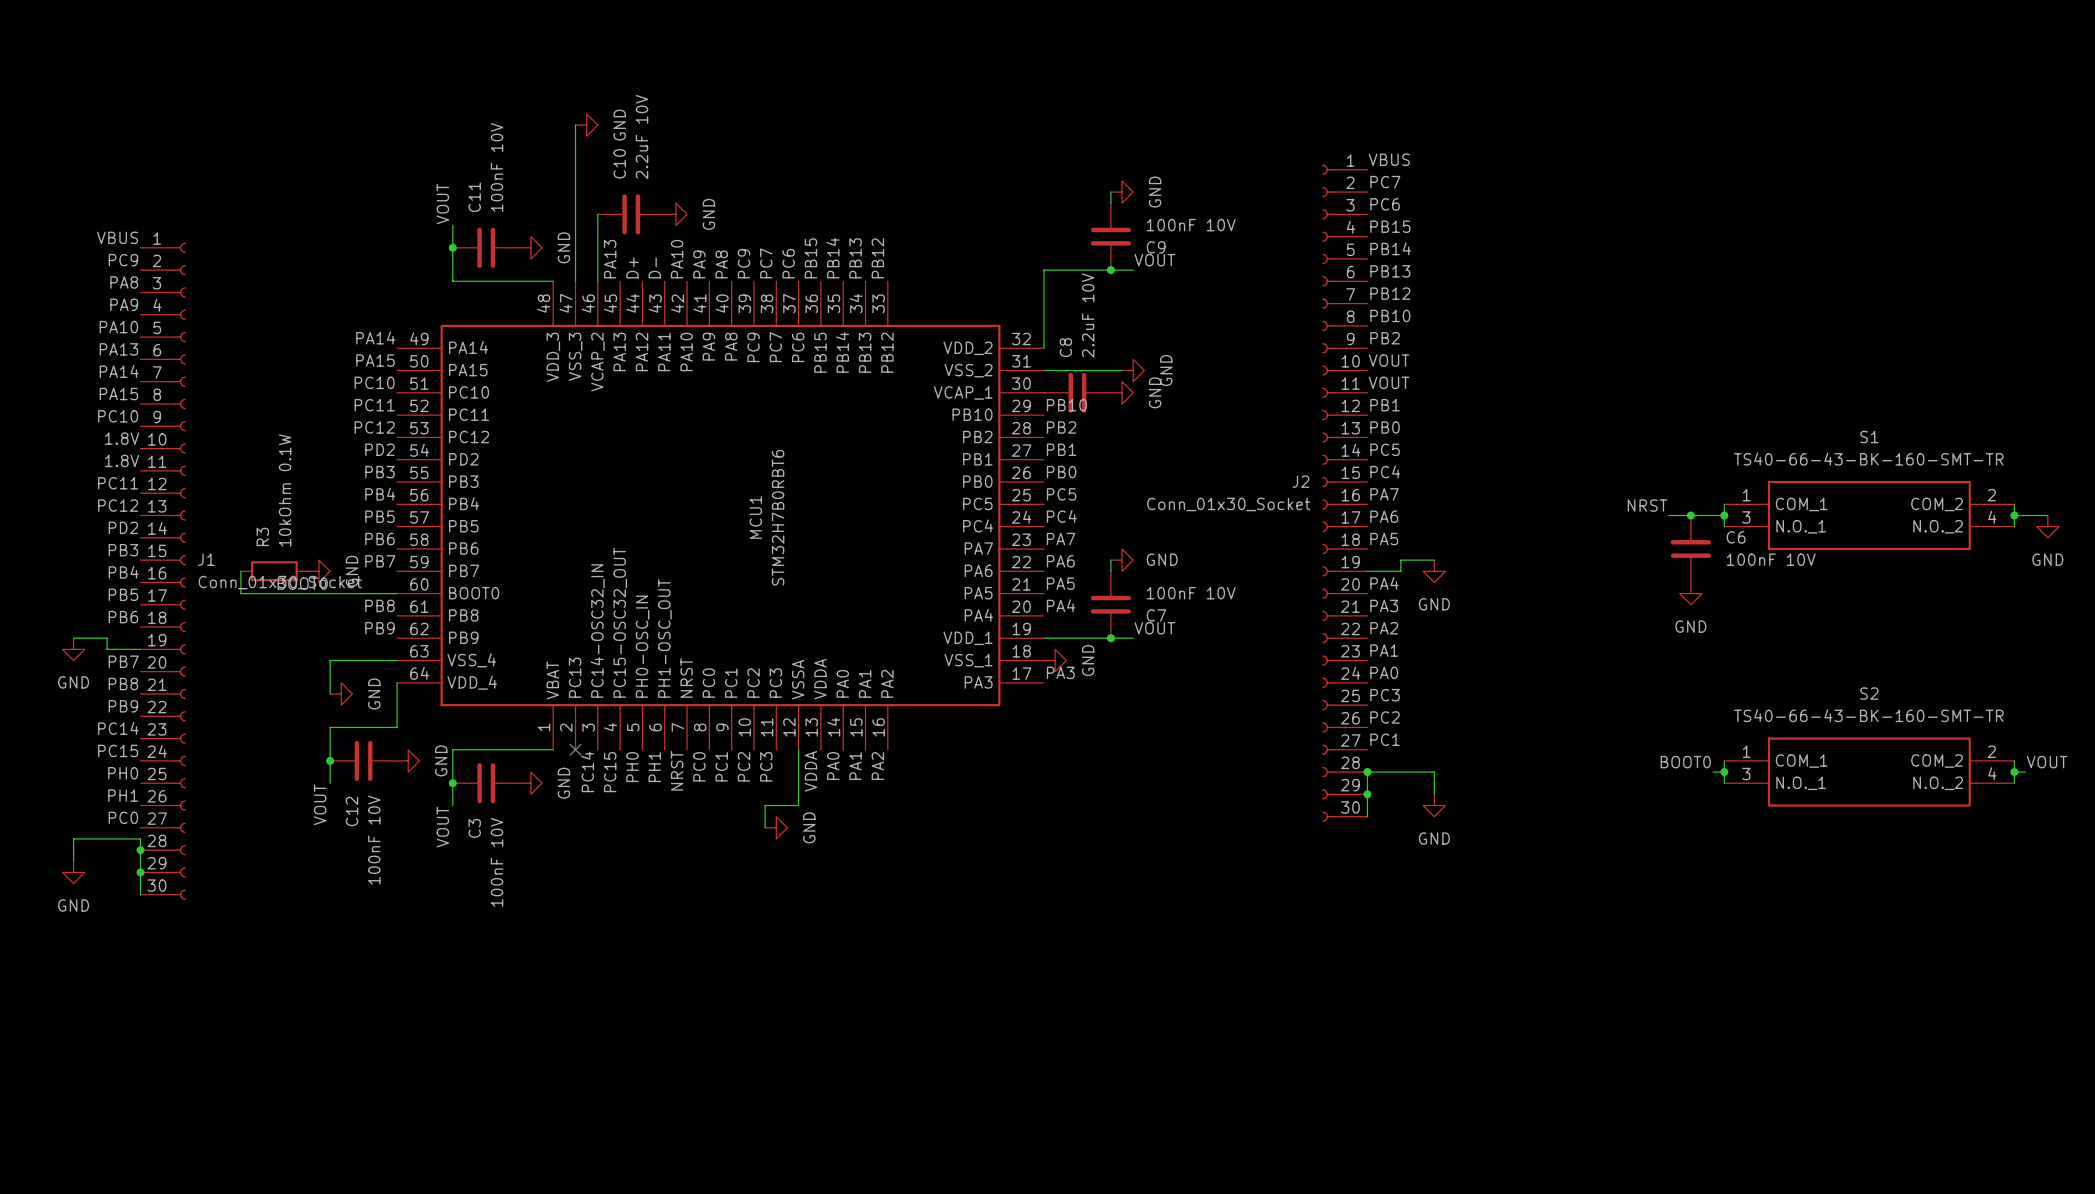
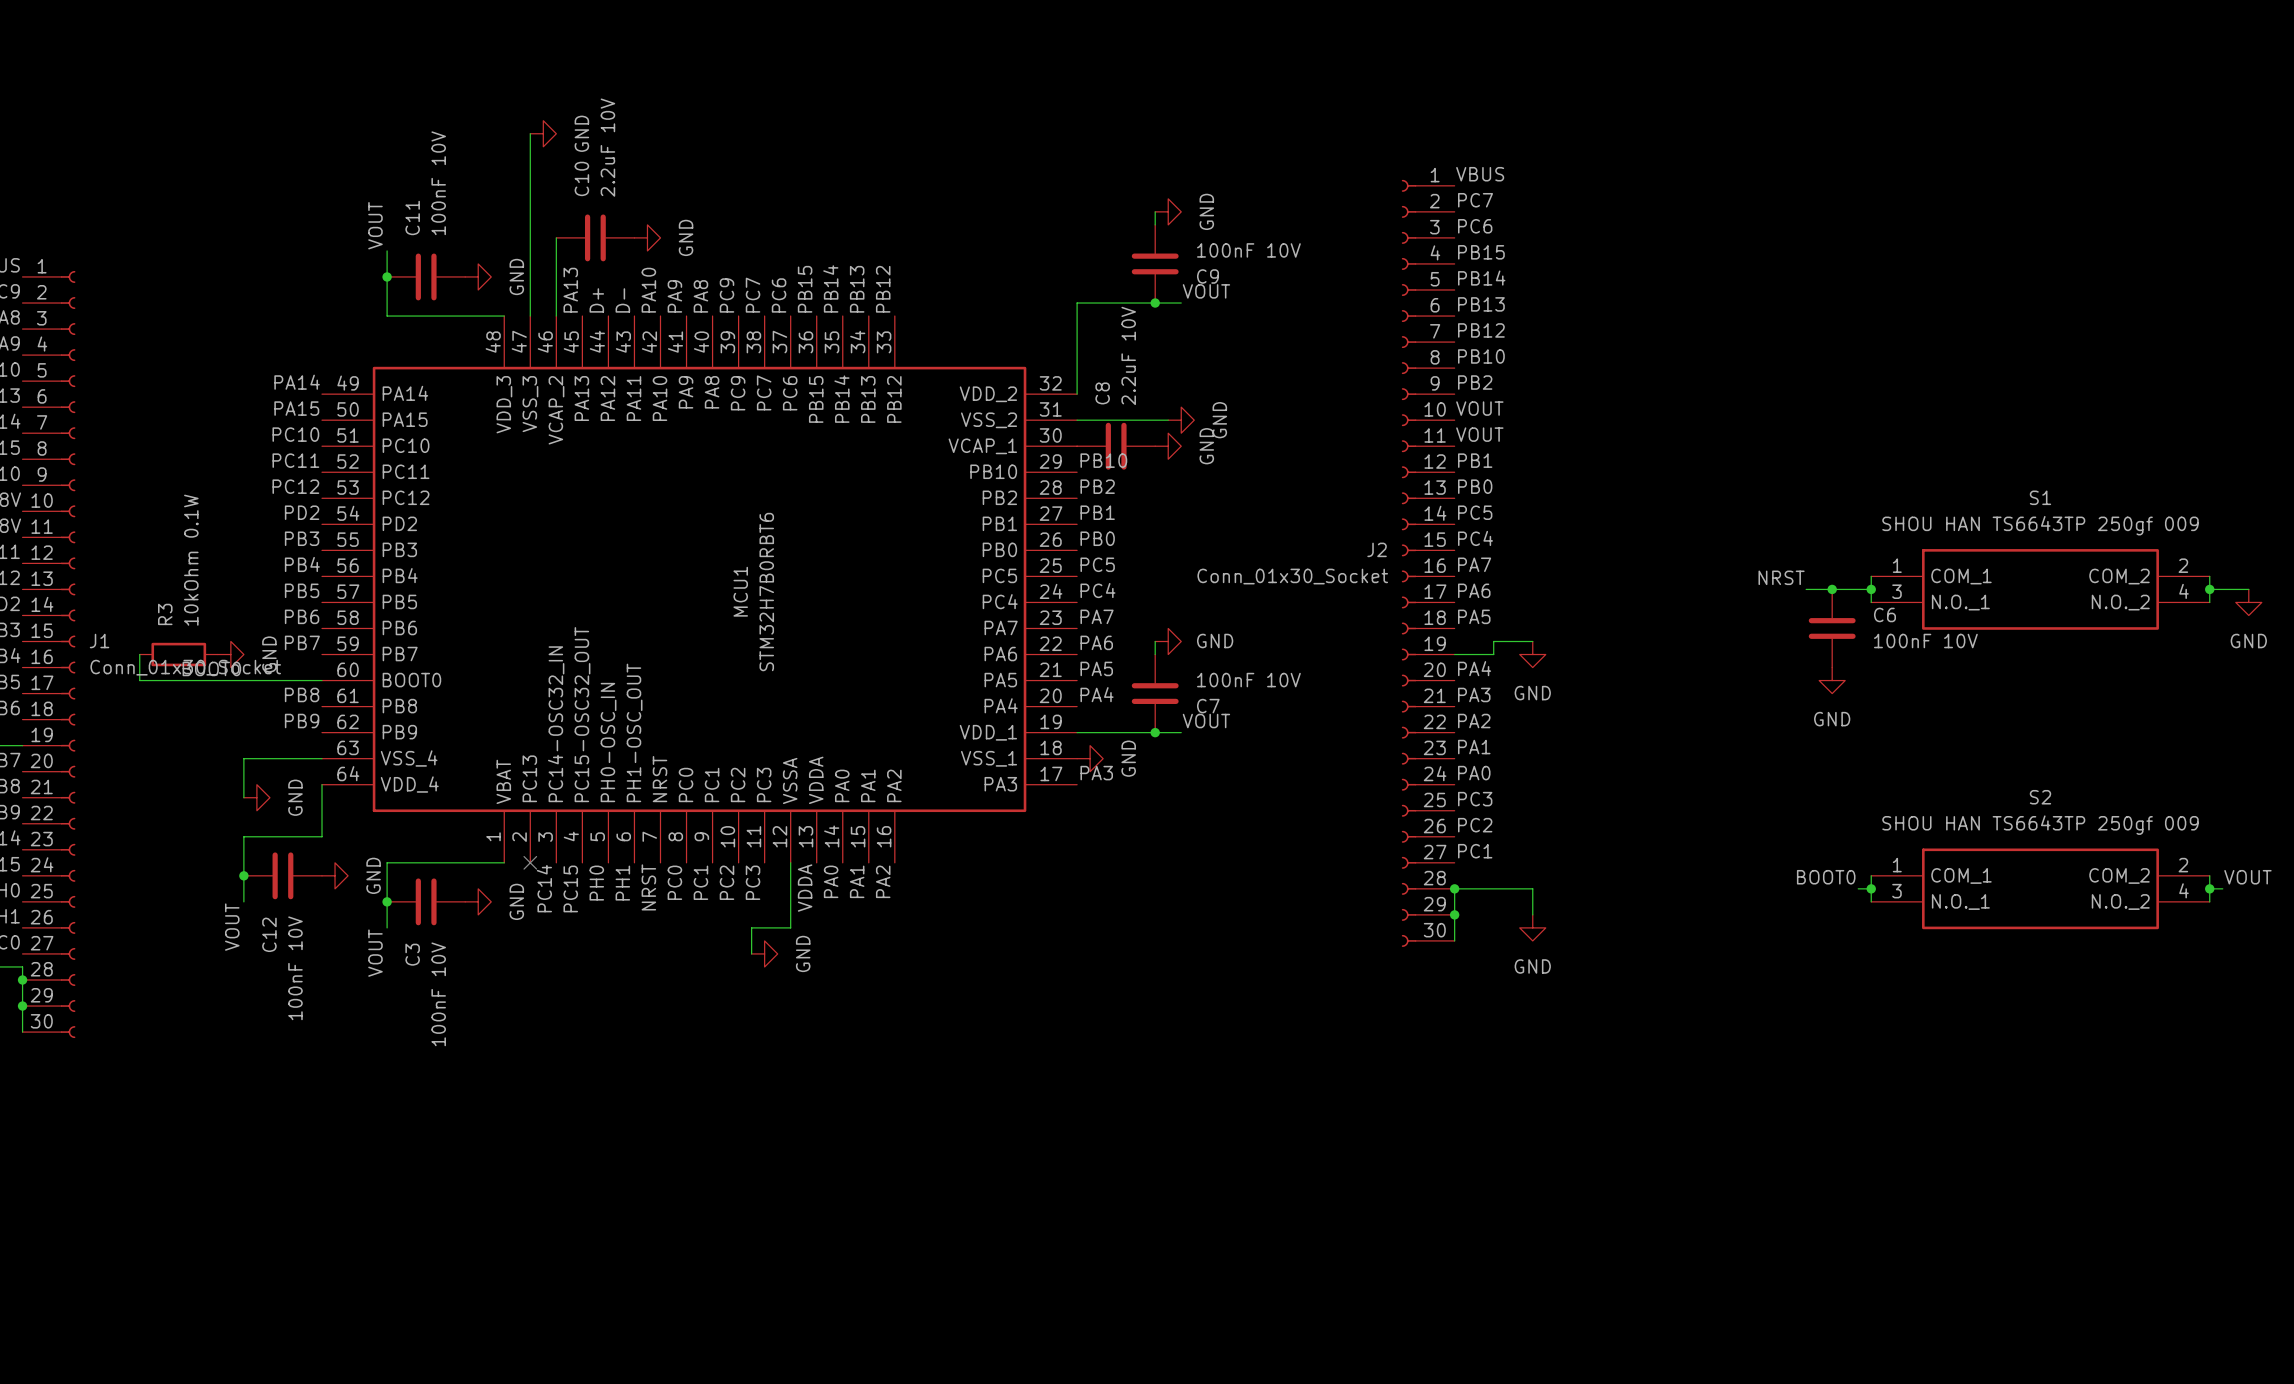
S1 value: TS40-66-43-BK-160-SMT-TR (1868, 459) -> SHOU HAN TS6643TP 250gf 009 (2040, 525)
S2 value: TS40-66-43-BK-160-SMT-TR (1868, 715) -> SHOU HAN TS6643TP 250gf 009 (2040, 825)

